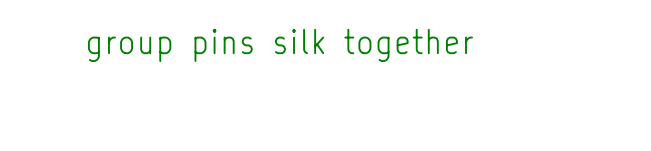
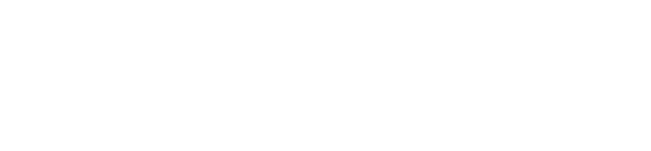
text: group pins silk together (280, 45) -> none

